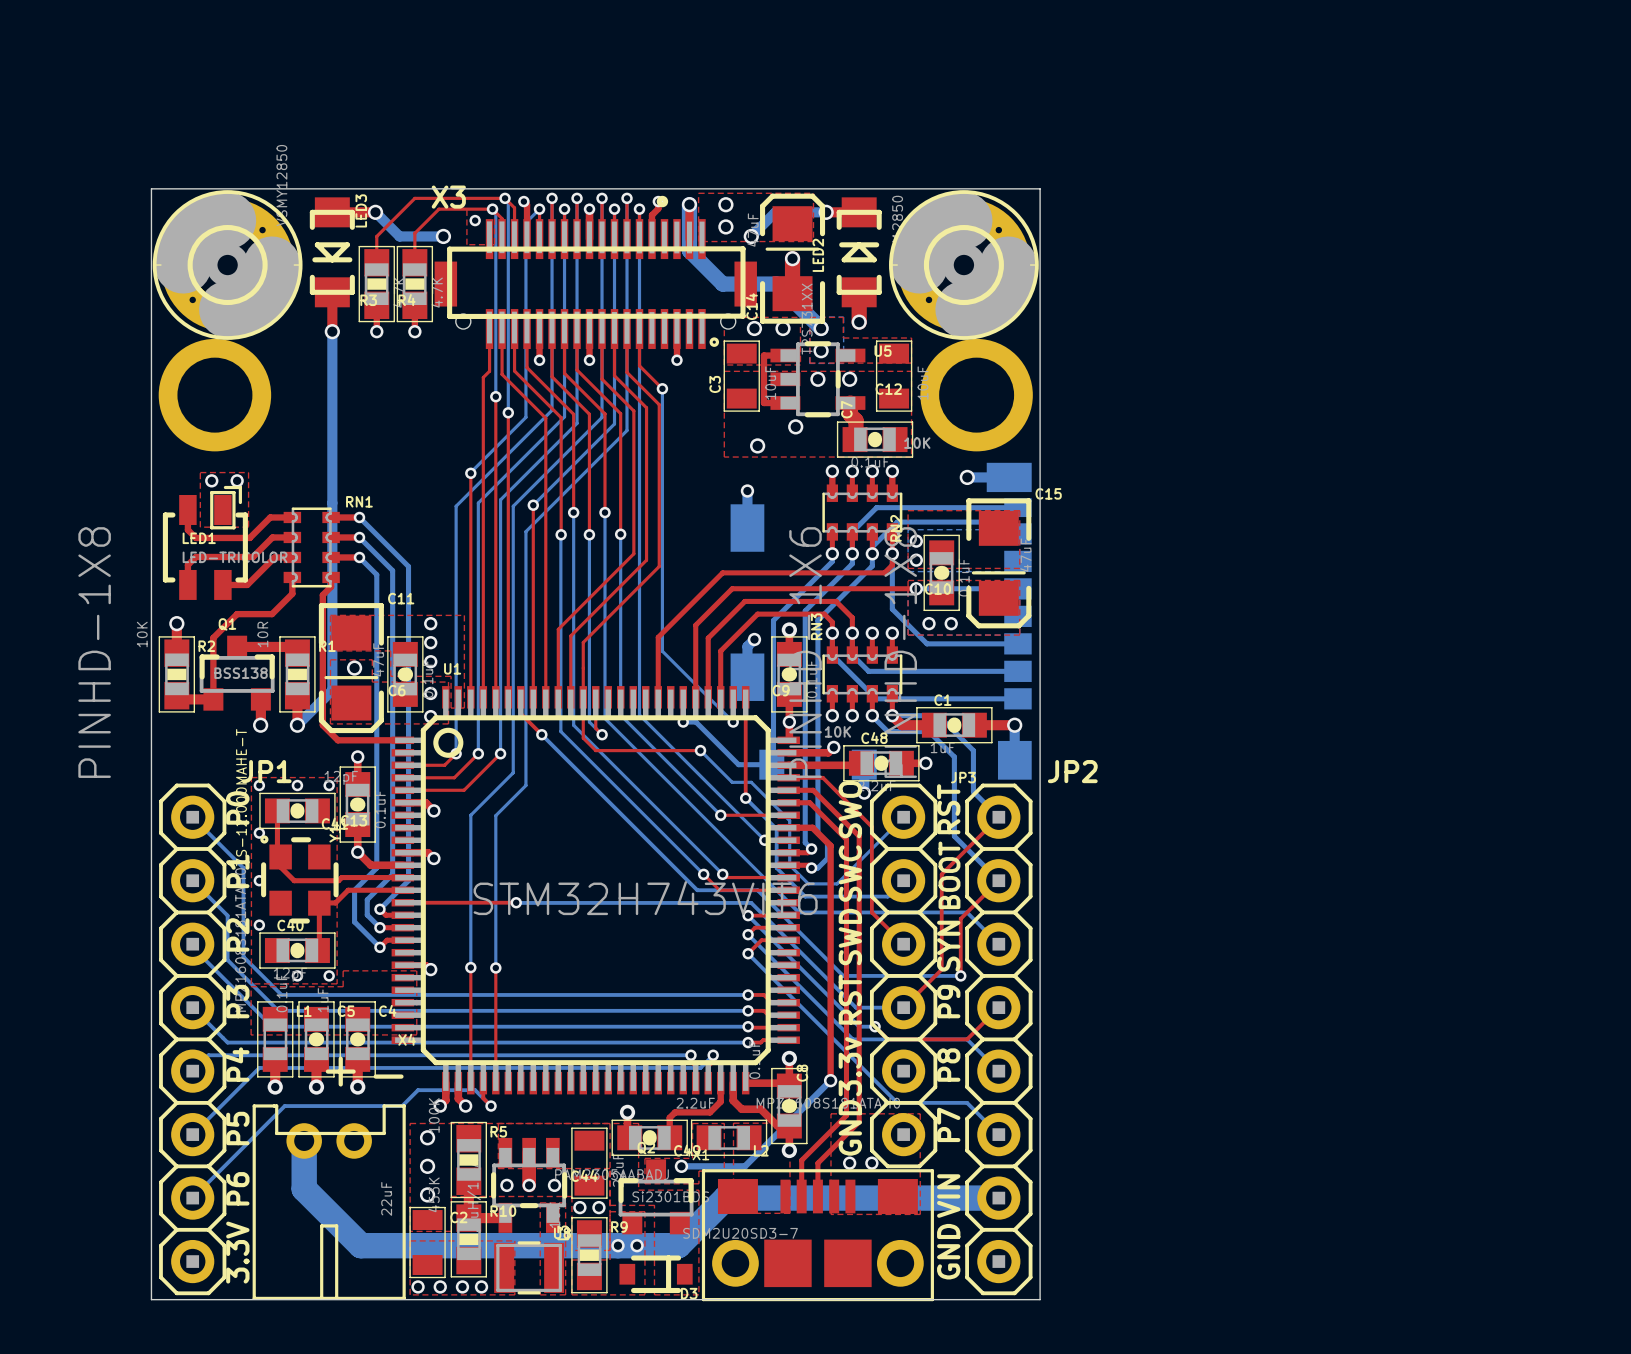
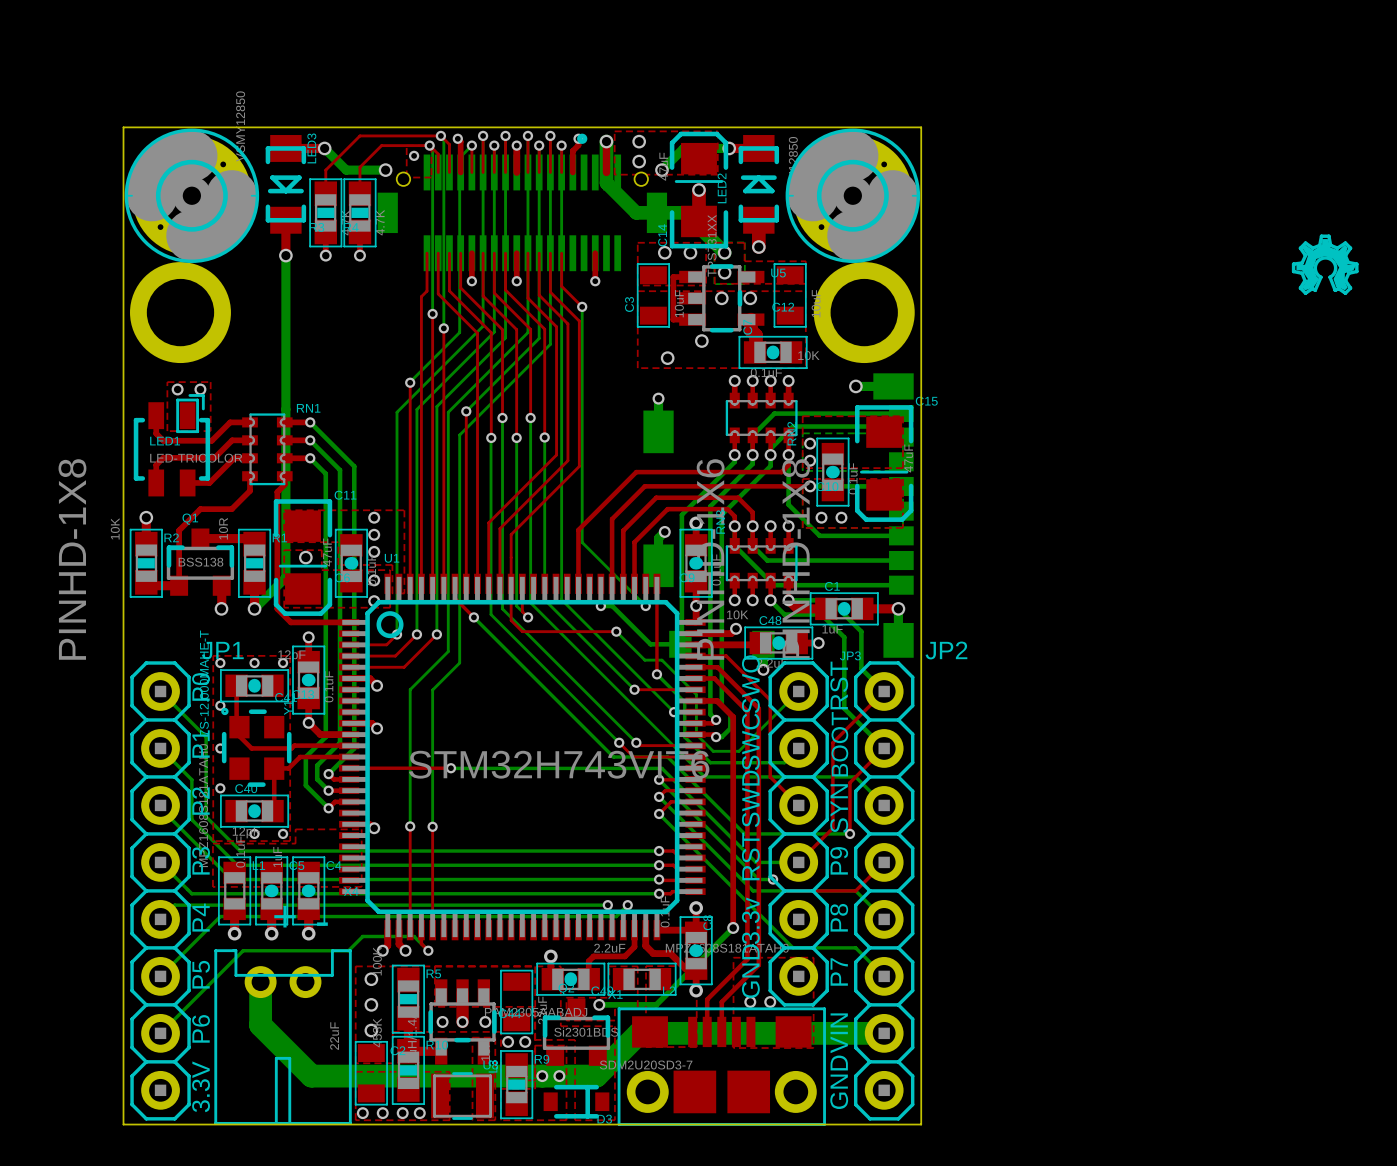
X3 side: top (595, 284) -> bottom (522, 212)
drawing: none -> [1291, 234, 1359, 295]

